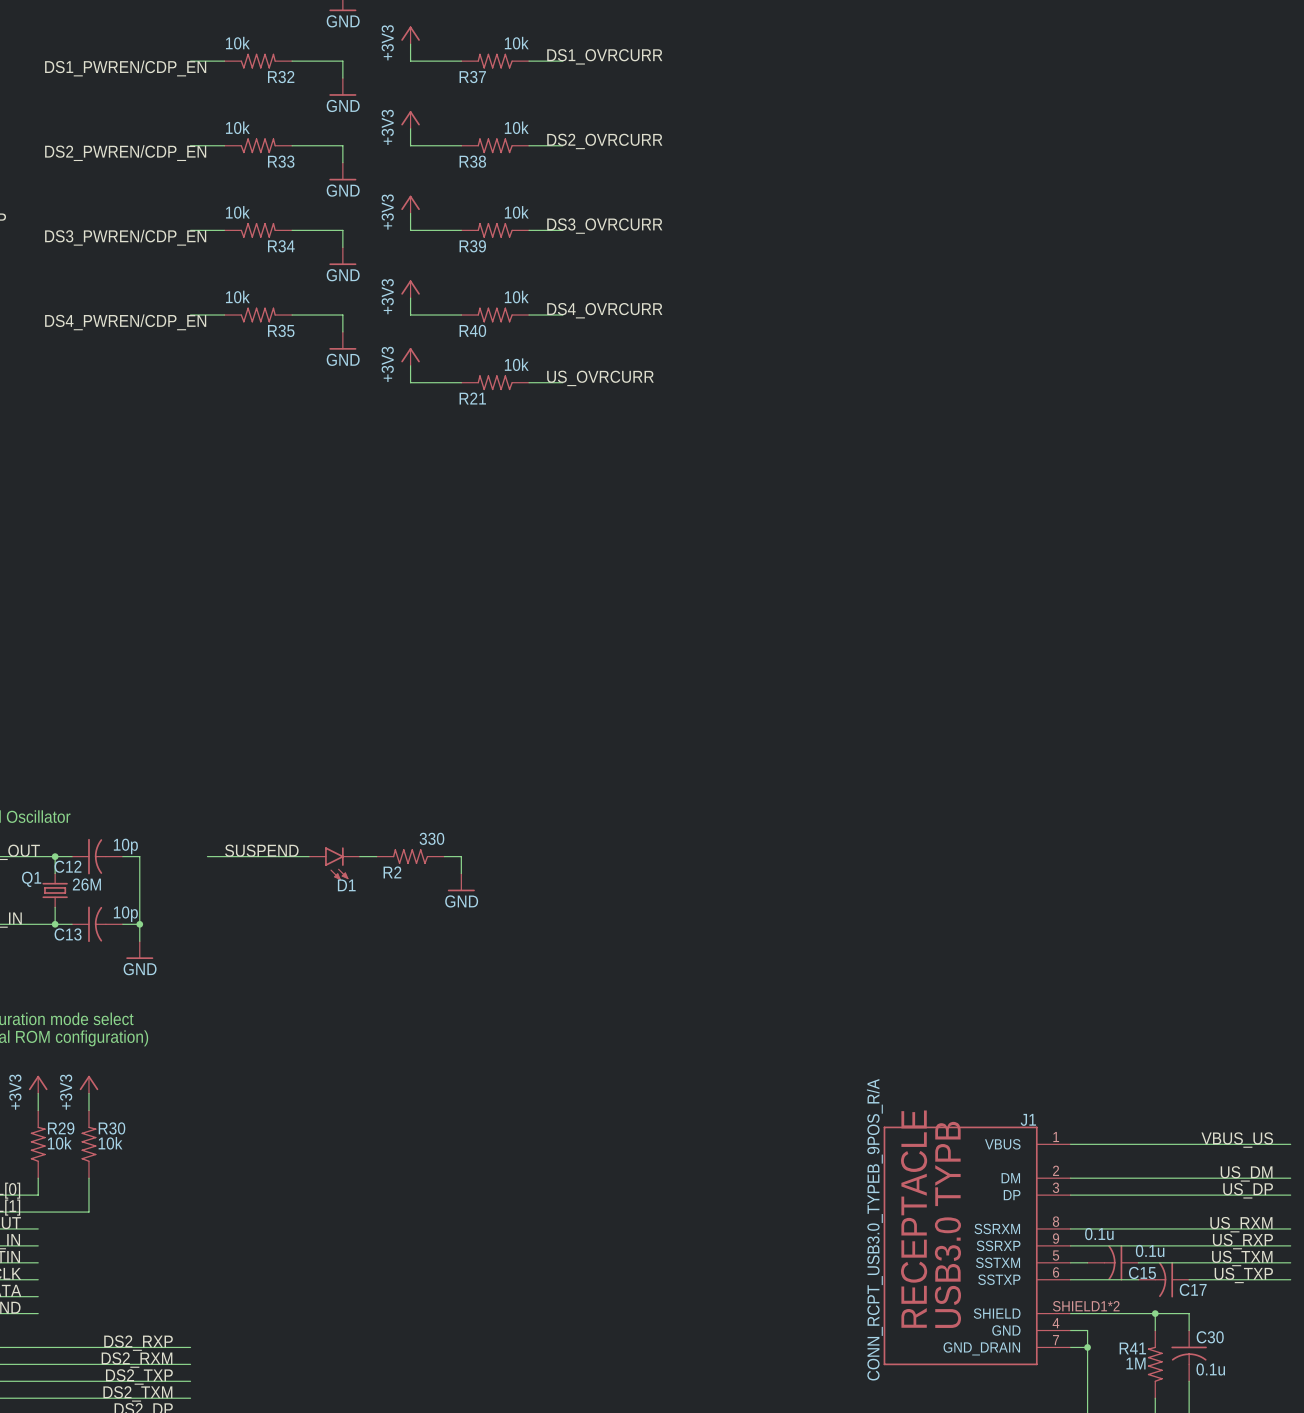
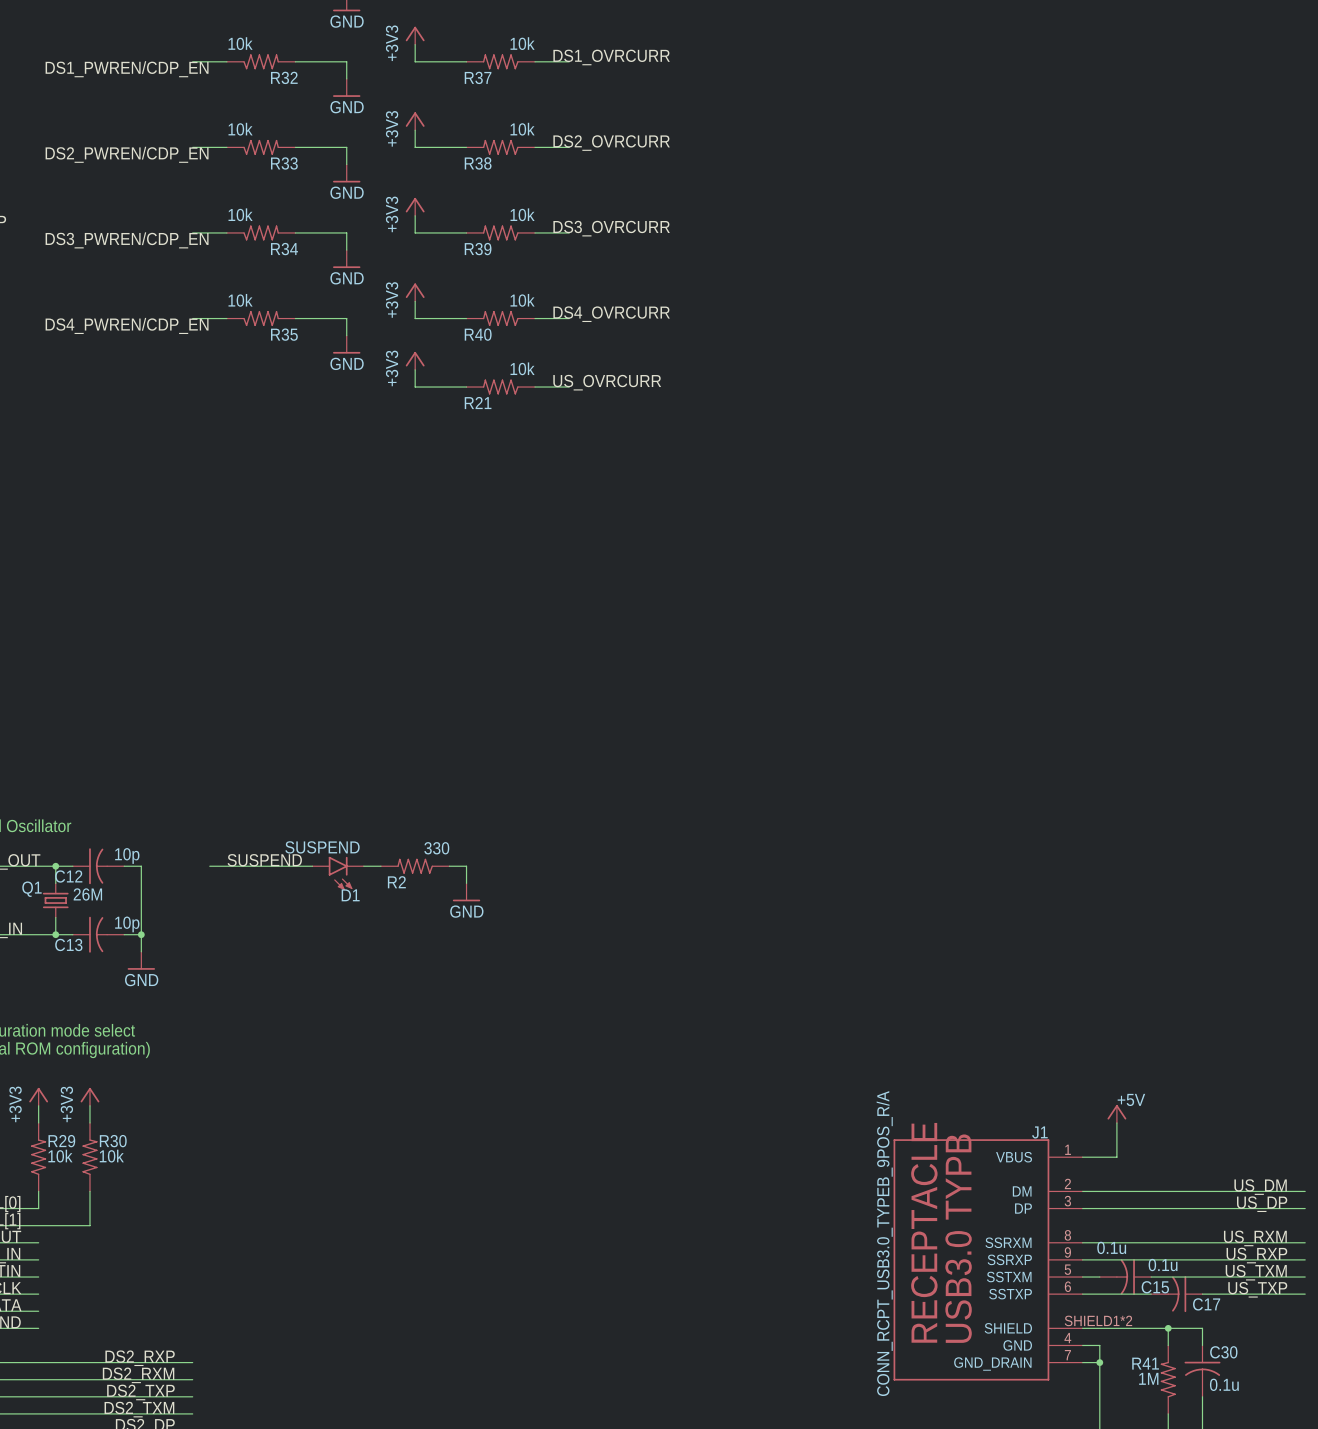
D1 value: none -> SUSPEND (322, 847)
power symbol: none -> +5V (1116, 1113)
label: VBUS_US (1237, 1140) -> none
wire: (1104, 1144) (1290, 1144) -> (1116, 1157) (1116, 1122)

